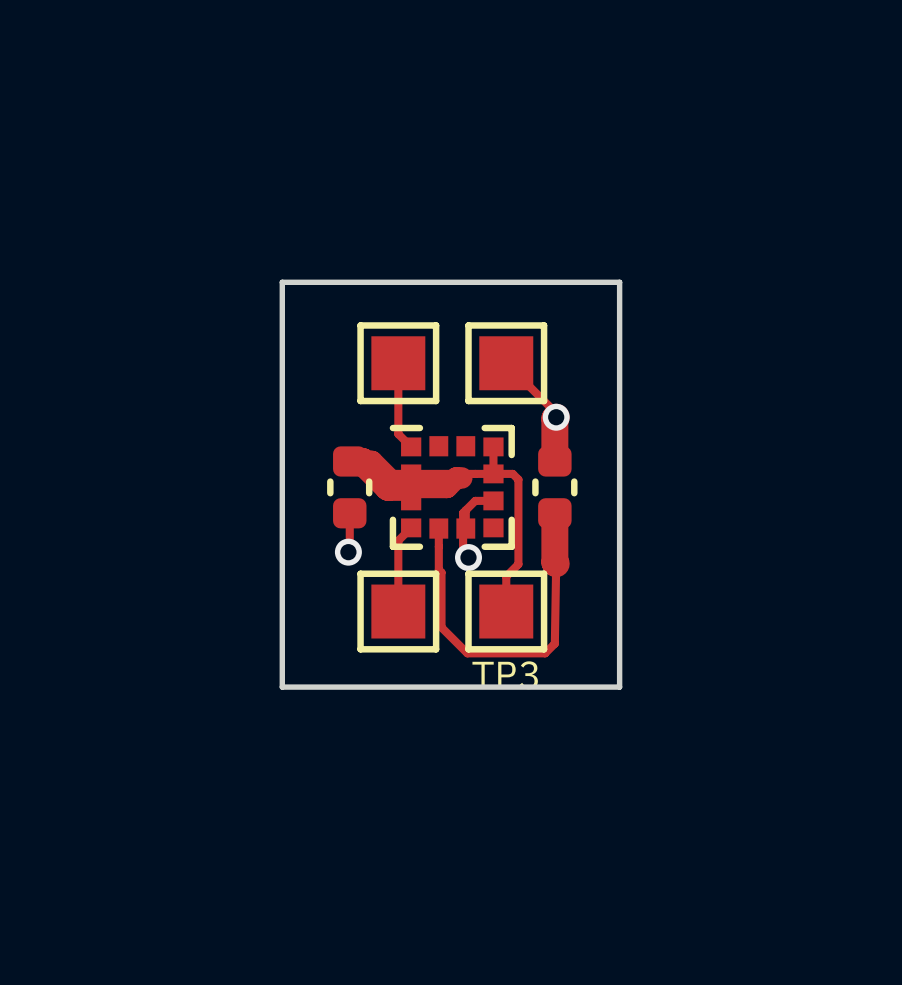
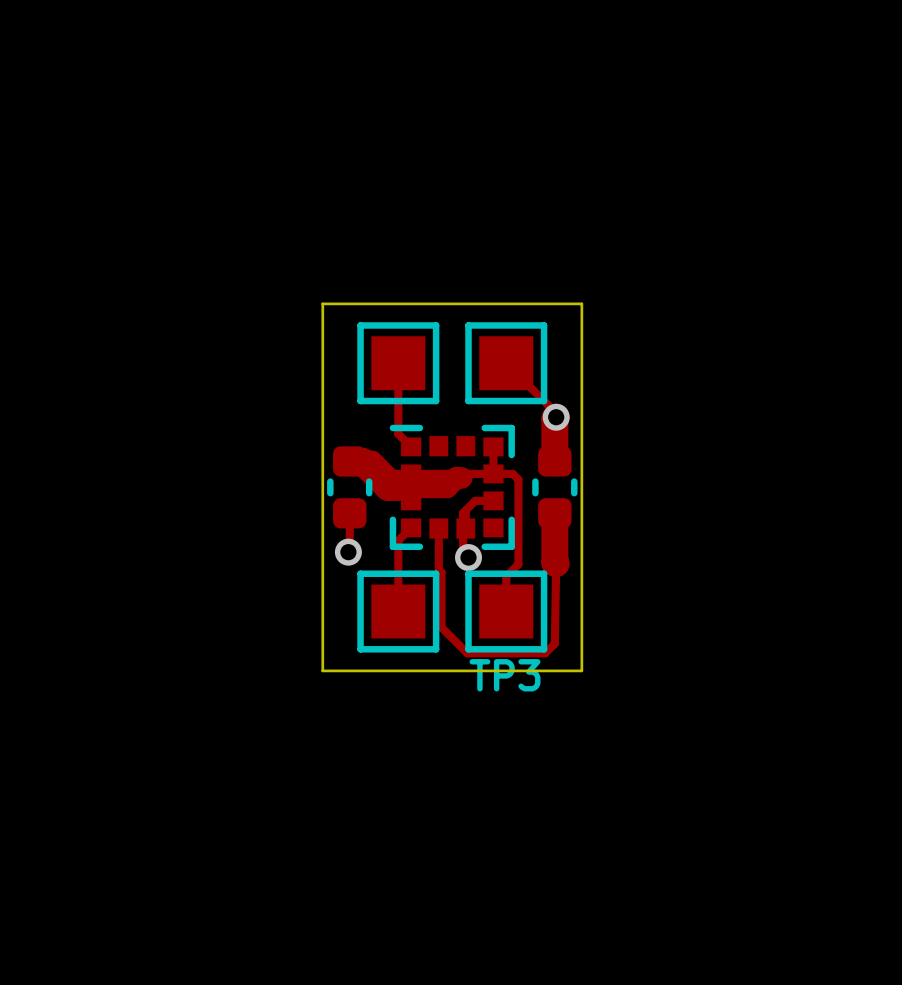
board edge: (282, 282) (282, 687) (619, 687) (619, 282) (282, 282) -> (322, 303) (322, 670) (581, 670) (581, 303) (322, 303)

